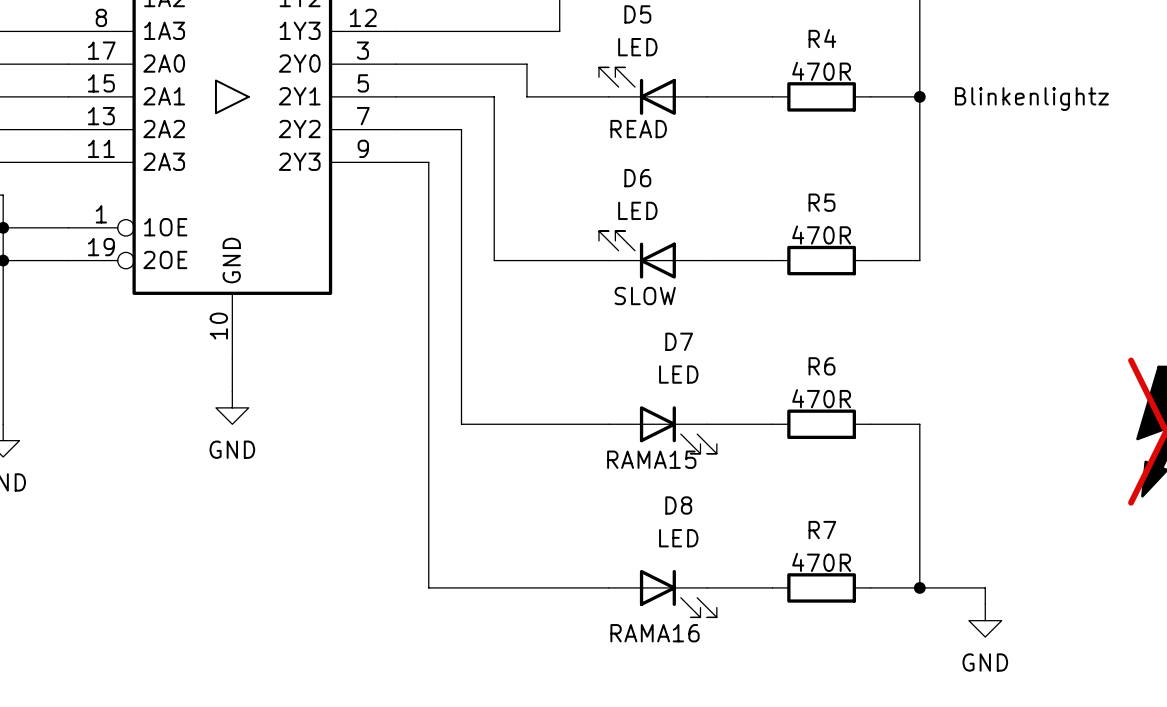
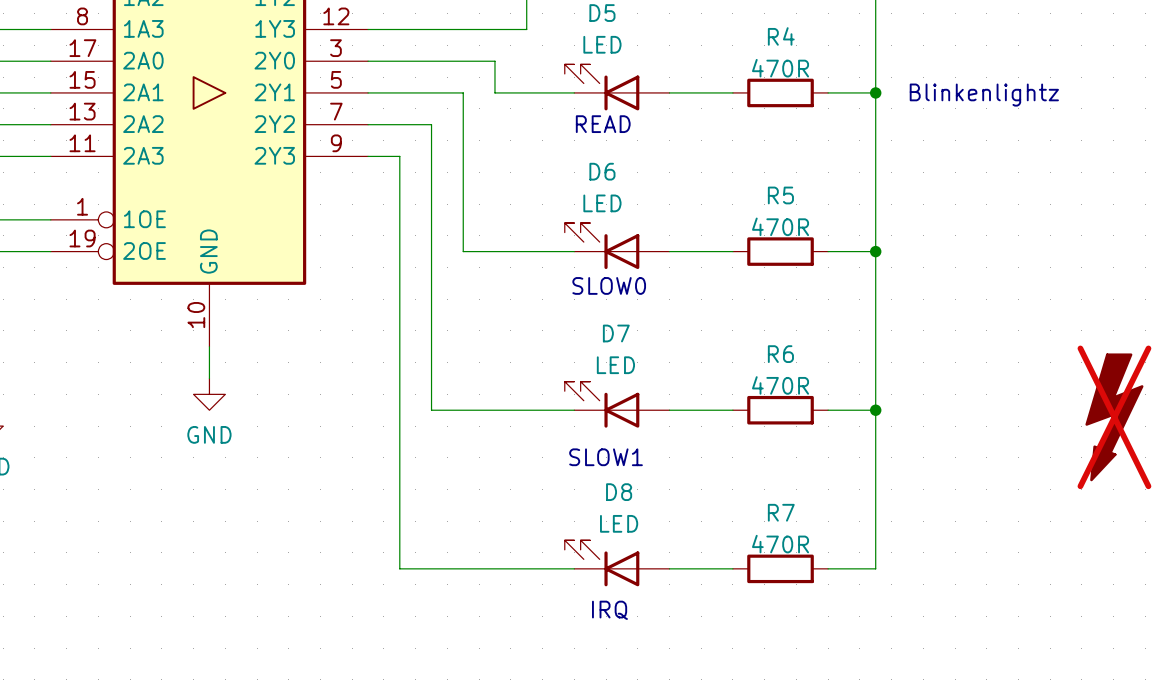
wire: none -> (875, 251) (875, 410)
junction: none -> (875, 251)
text: SLOW (645, 296) -> SLOW0 (609, 285)
junction: none -> (875, 410)
D7 rotation: 0° (678, 429) -> 180° (602, 404)
text: RAMA15 (651, 459) -> none
text: none -> SLOW1 (606, 457)
wire: (919, 587) (985, 587) (985, 604) -> none
junction: (919, 587) -> none
D8 rotation: 0° (678, 593) -> 180° (602, 563)
power symbol: GND (985, 620) -> none
text: RAMA16 (655, 633) -> IRQ (609, 610)

